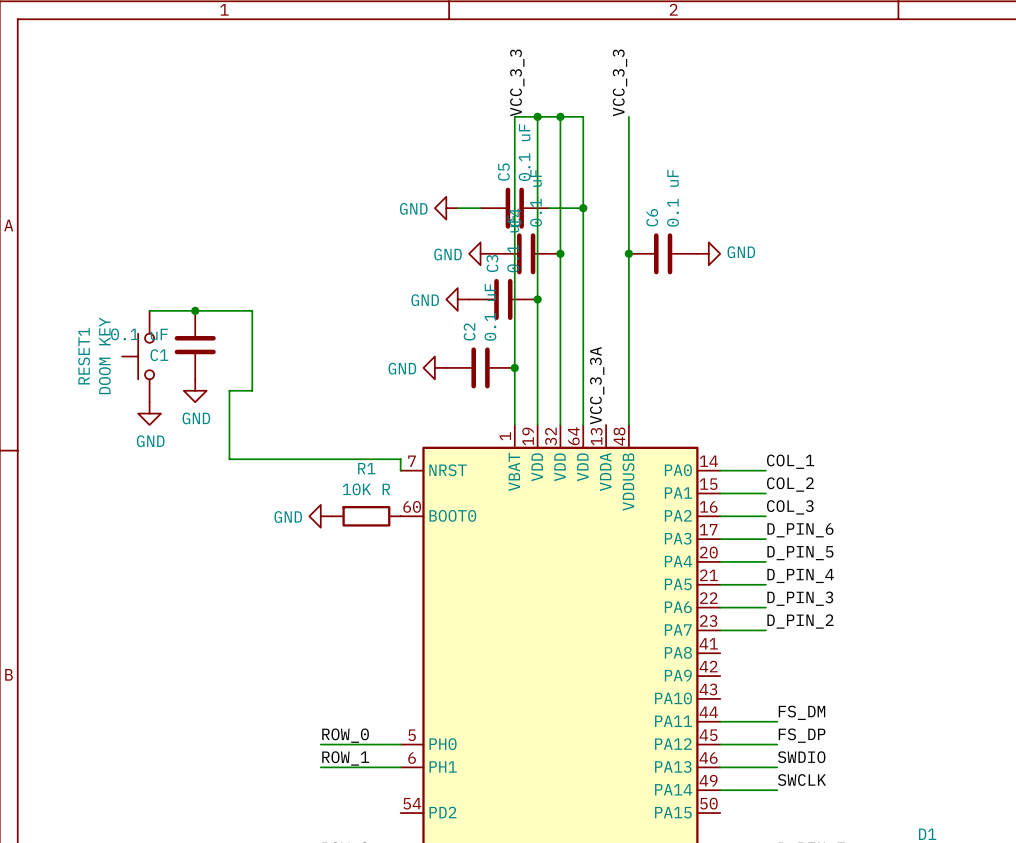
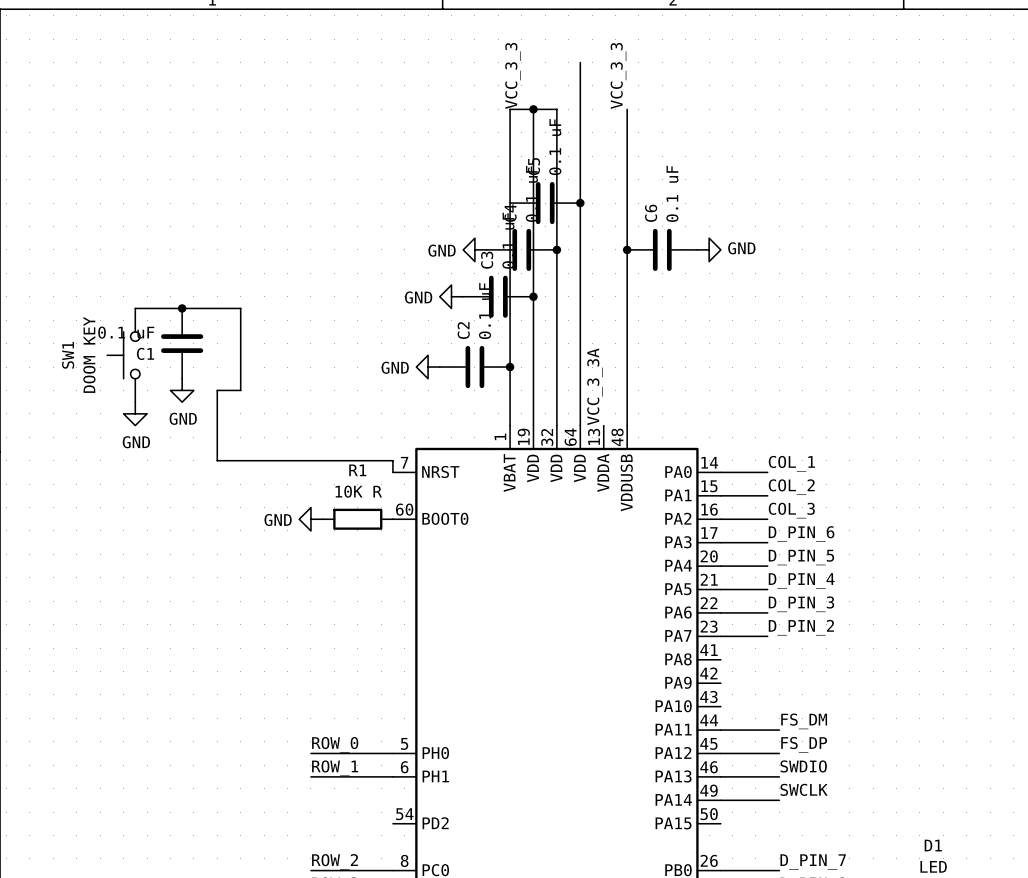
wire: (560, 116) (583, 116) -> (580, 62) (580, 109)
junction: (560, 116) -> none
power symbol: GND (446, 208) -> none
wire: (457, 208) (480, 208) -> none
C5 position: (514, 208) -> (545, 203)
RESET1 name: RESET1 (84, 356) -> SW1 (68, 355)

